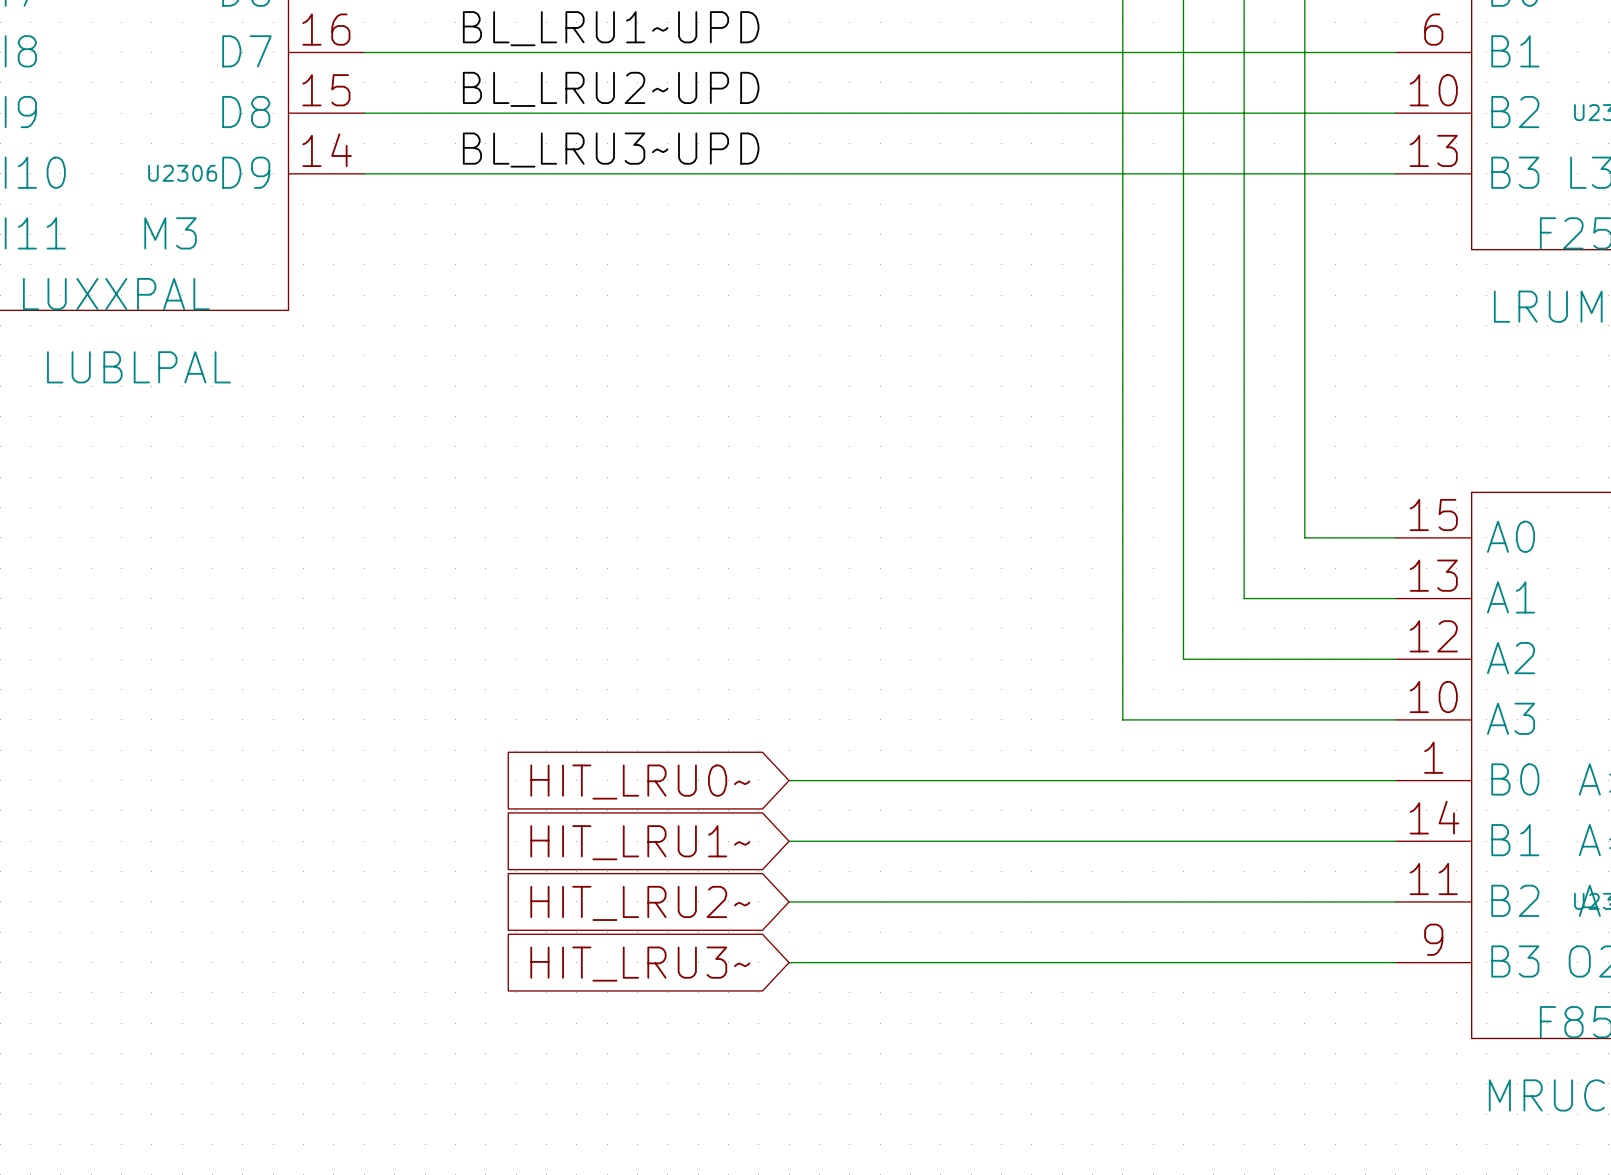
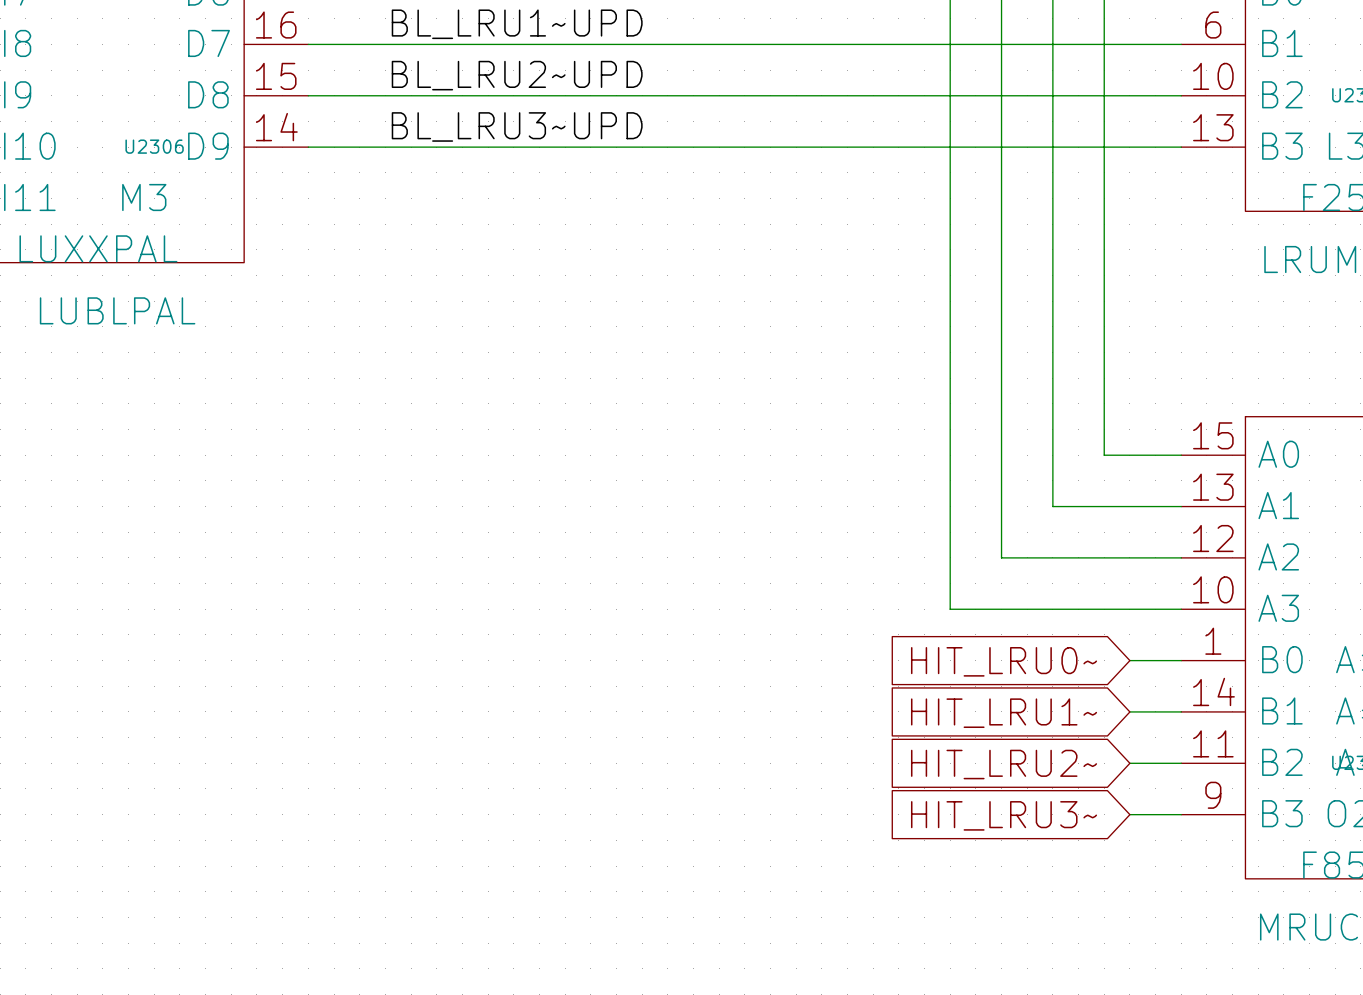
wire: (789, 780) (1335, 780) -> none
global label: HIT_LRU0~ (640, 782) -> none
global label: none -> HIT_LRU0~ (1004, 661)
wire: (789, 841) (1335, 841) -> none
global label: HIT_LRU1~ (640, 842) -> none
global label: none -> HIT_LRU1~ (1004, 713)
wire: (789, 901) (1335, 901) -> none
global label: HIT_LRU2~ (640, 903) -> none
global label: none -> HIT_LRU2~ (1004, 764)
wire: (789, 962) (1335, 962) -> none
global label: HIT_LRU3~ (640, 964) -> none
global label: none -> HIT_LRU3~ (1004, 815)

